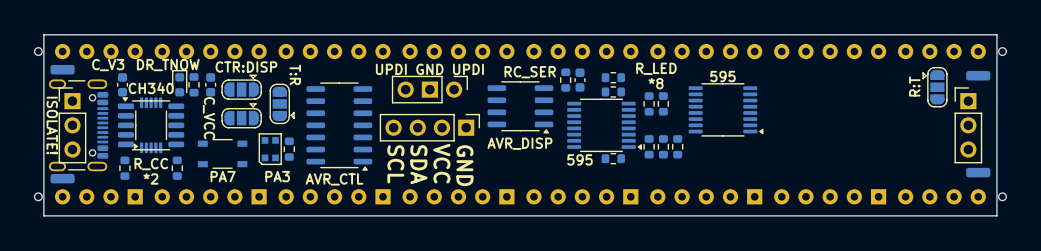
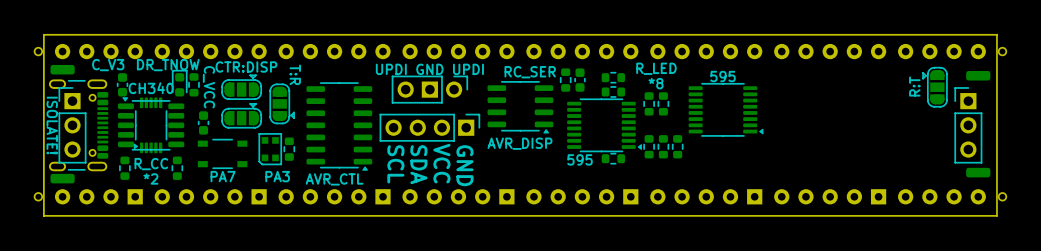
part position: (210, 84) -> (203, 122)
text position: C_VCC (209, 118) -> C_VCC (209, 87)

